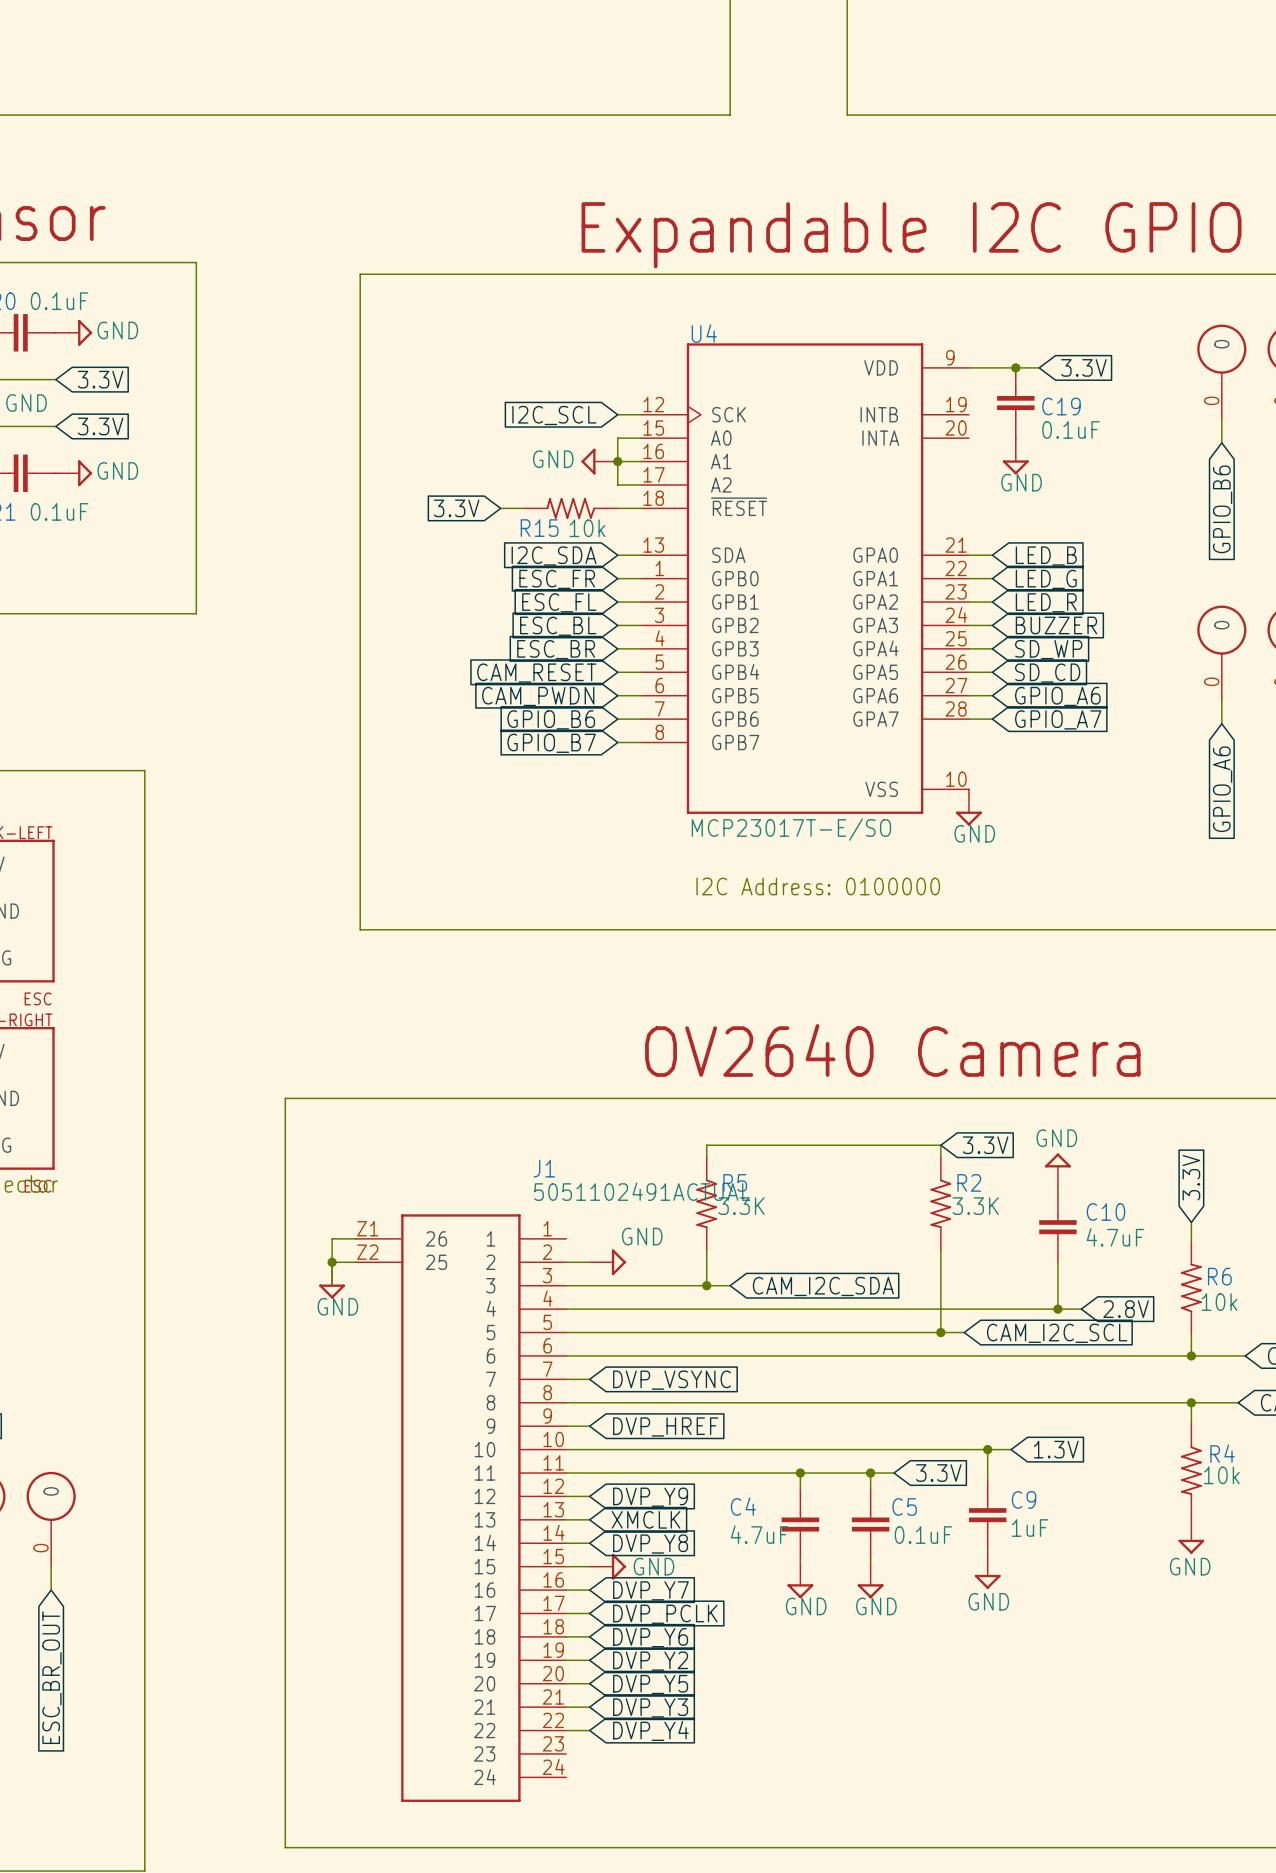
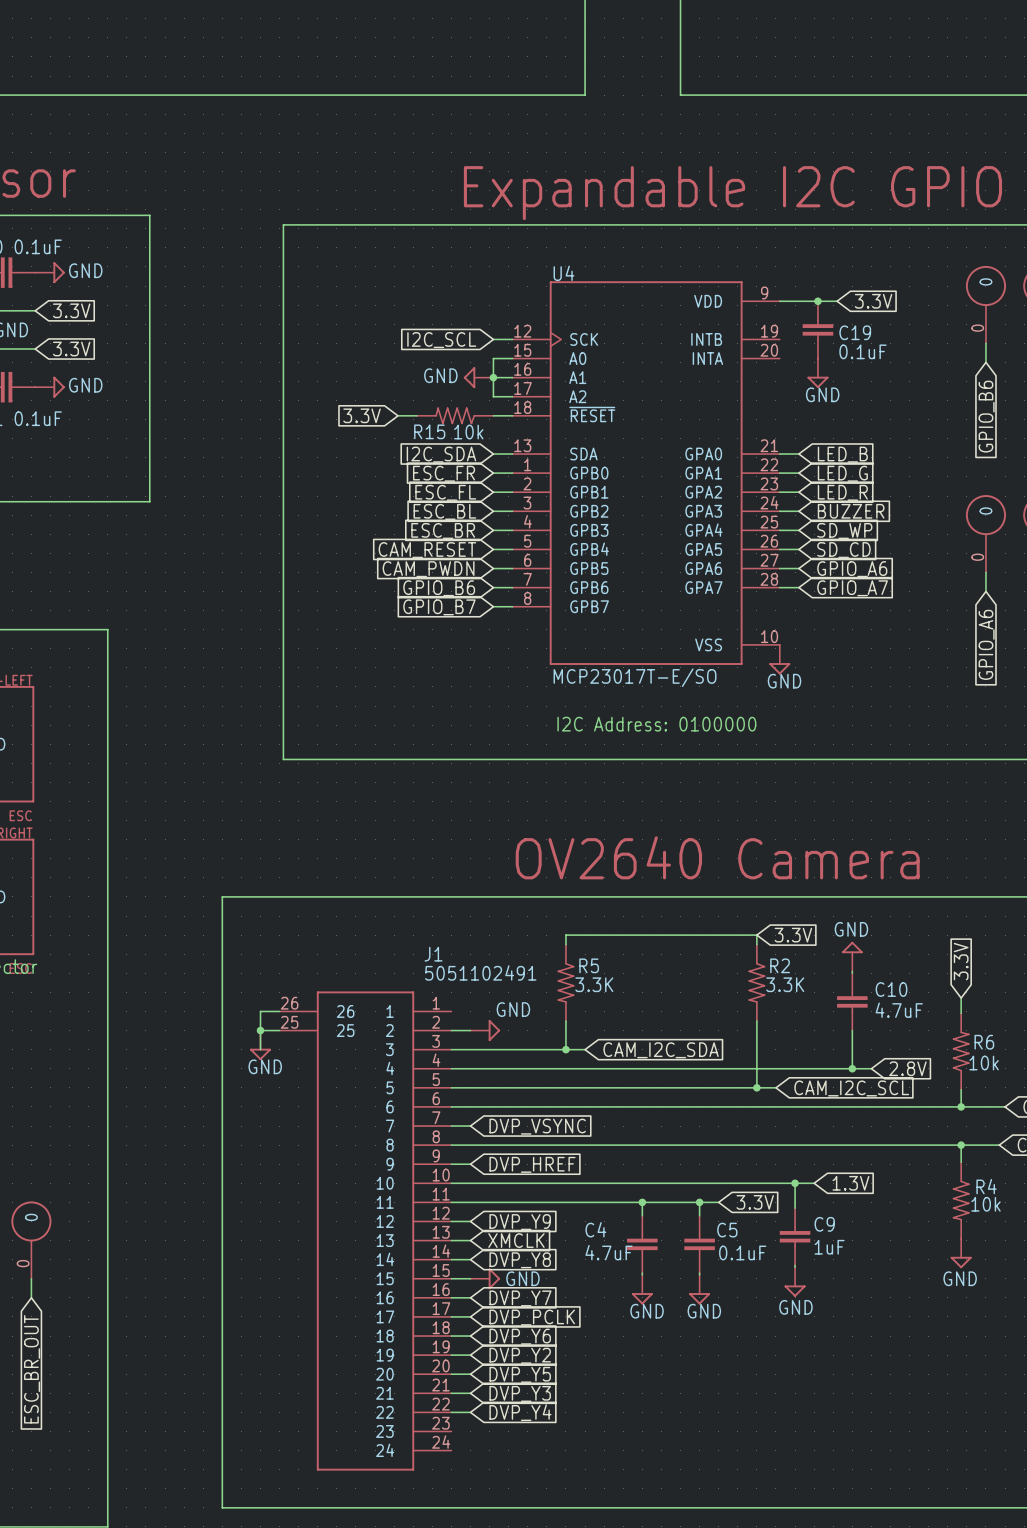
J1 value: 5051102491ACTUAL (642, 1191) -> 5051102491 (480, 972)
J1 pin number: Z1 (367, 1228) -> 26 (289, 1003)
J1 pin number: Z2 (367, 1252) -> 25 (289, 1022)

